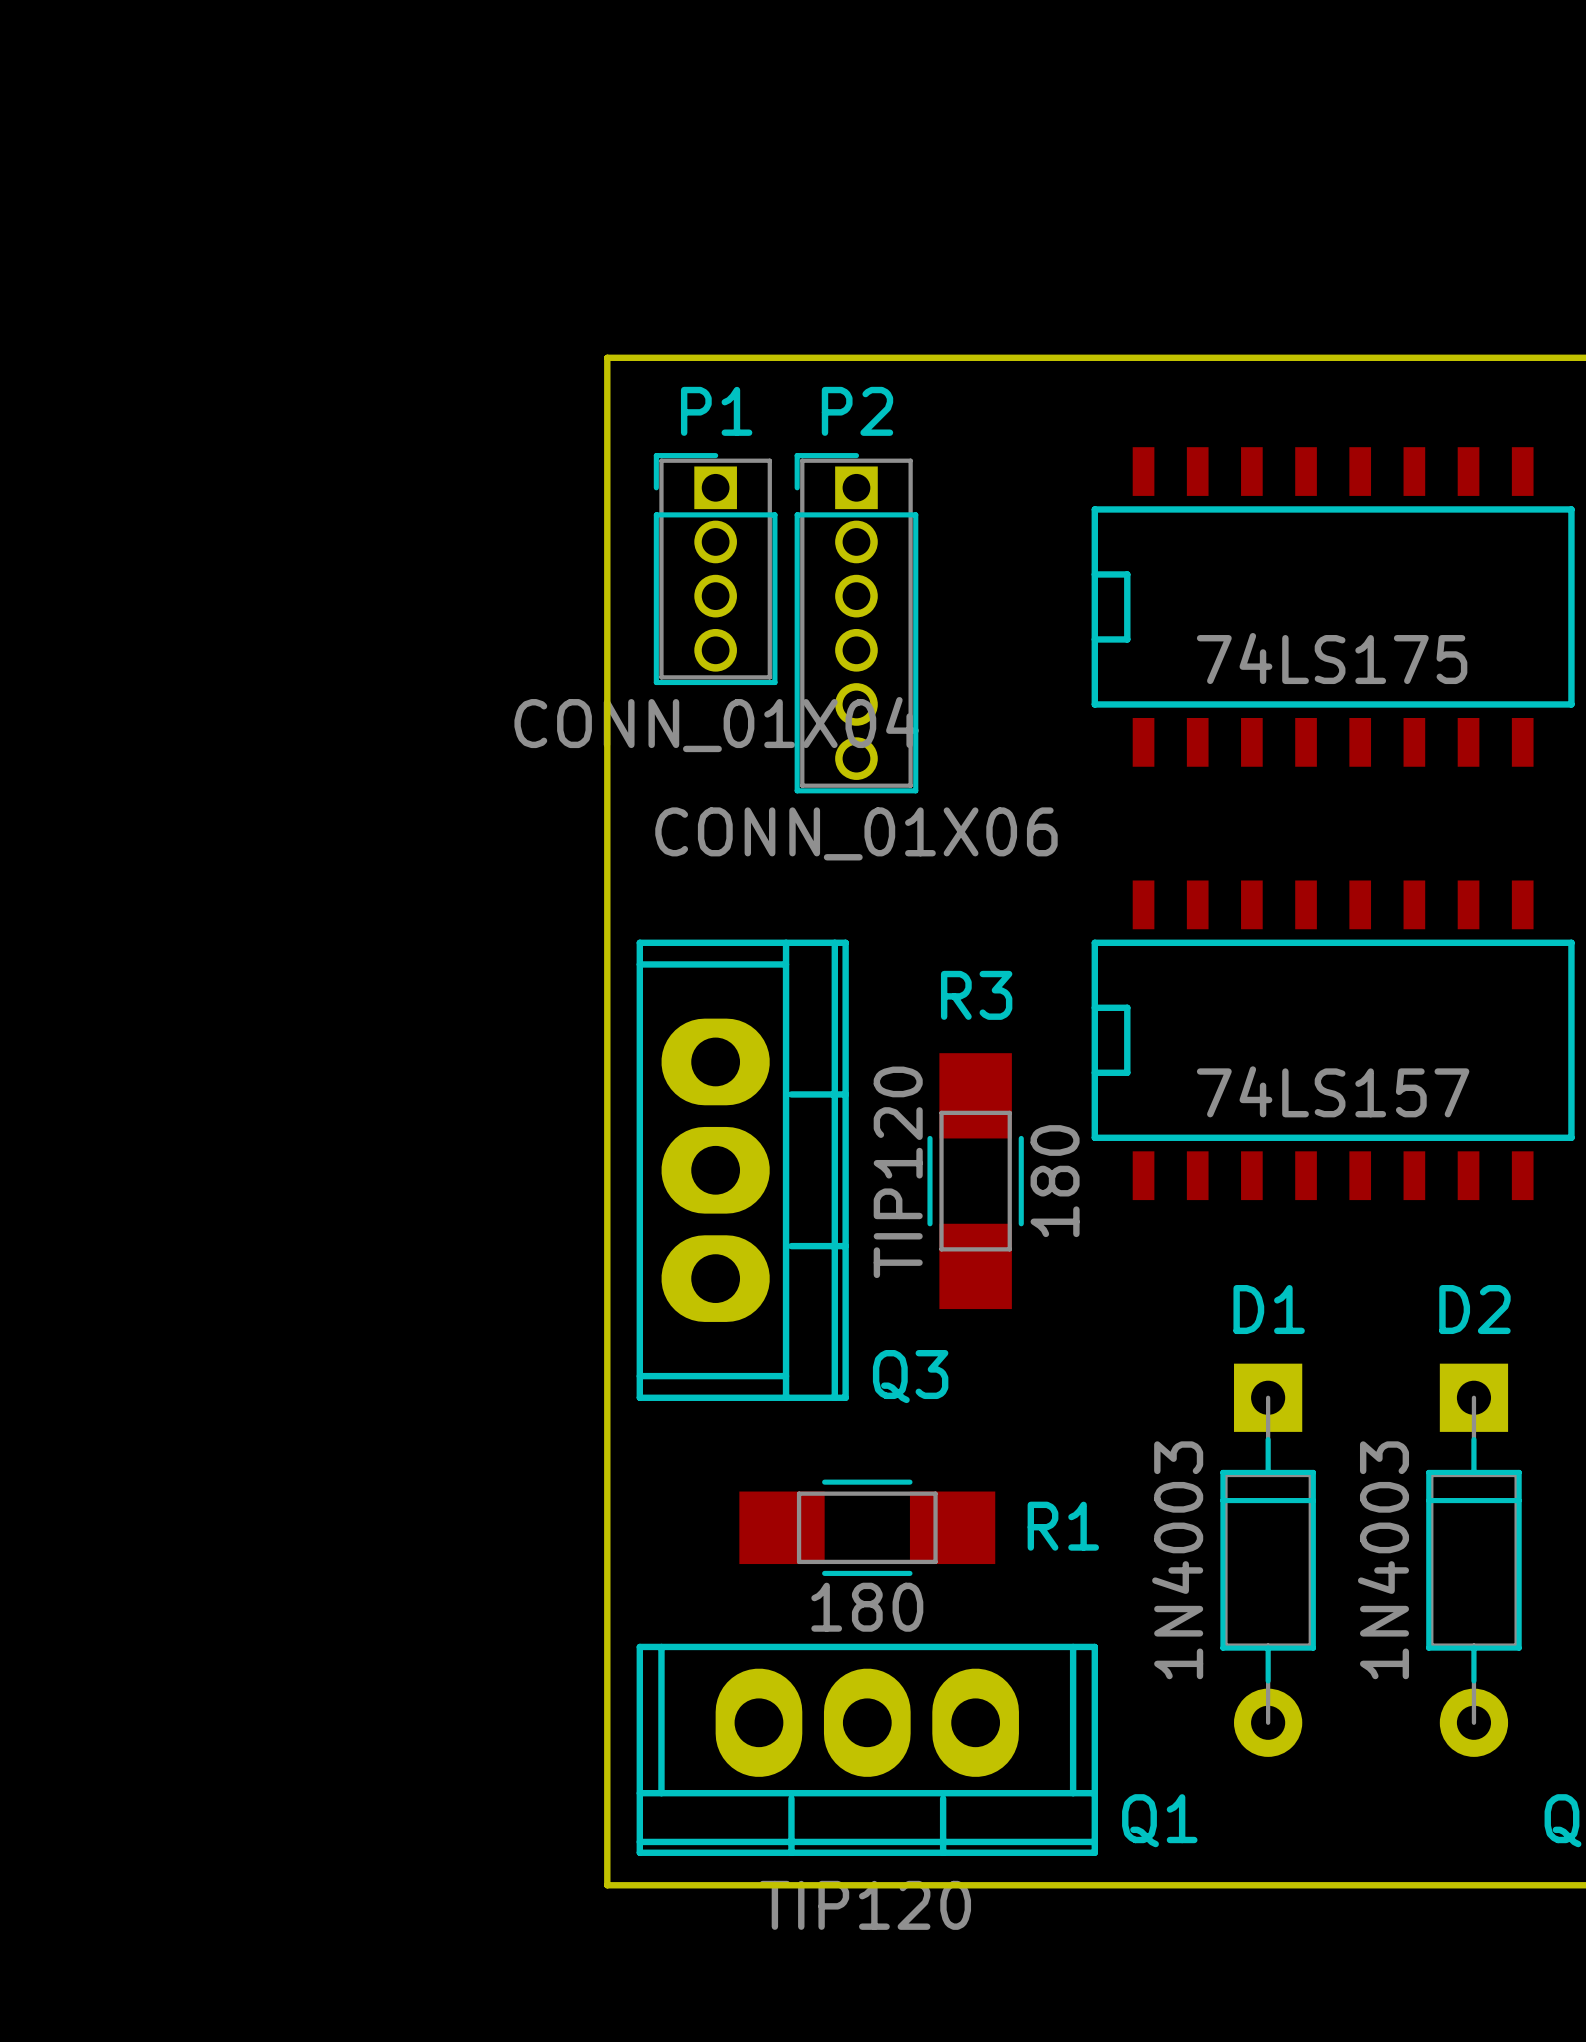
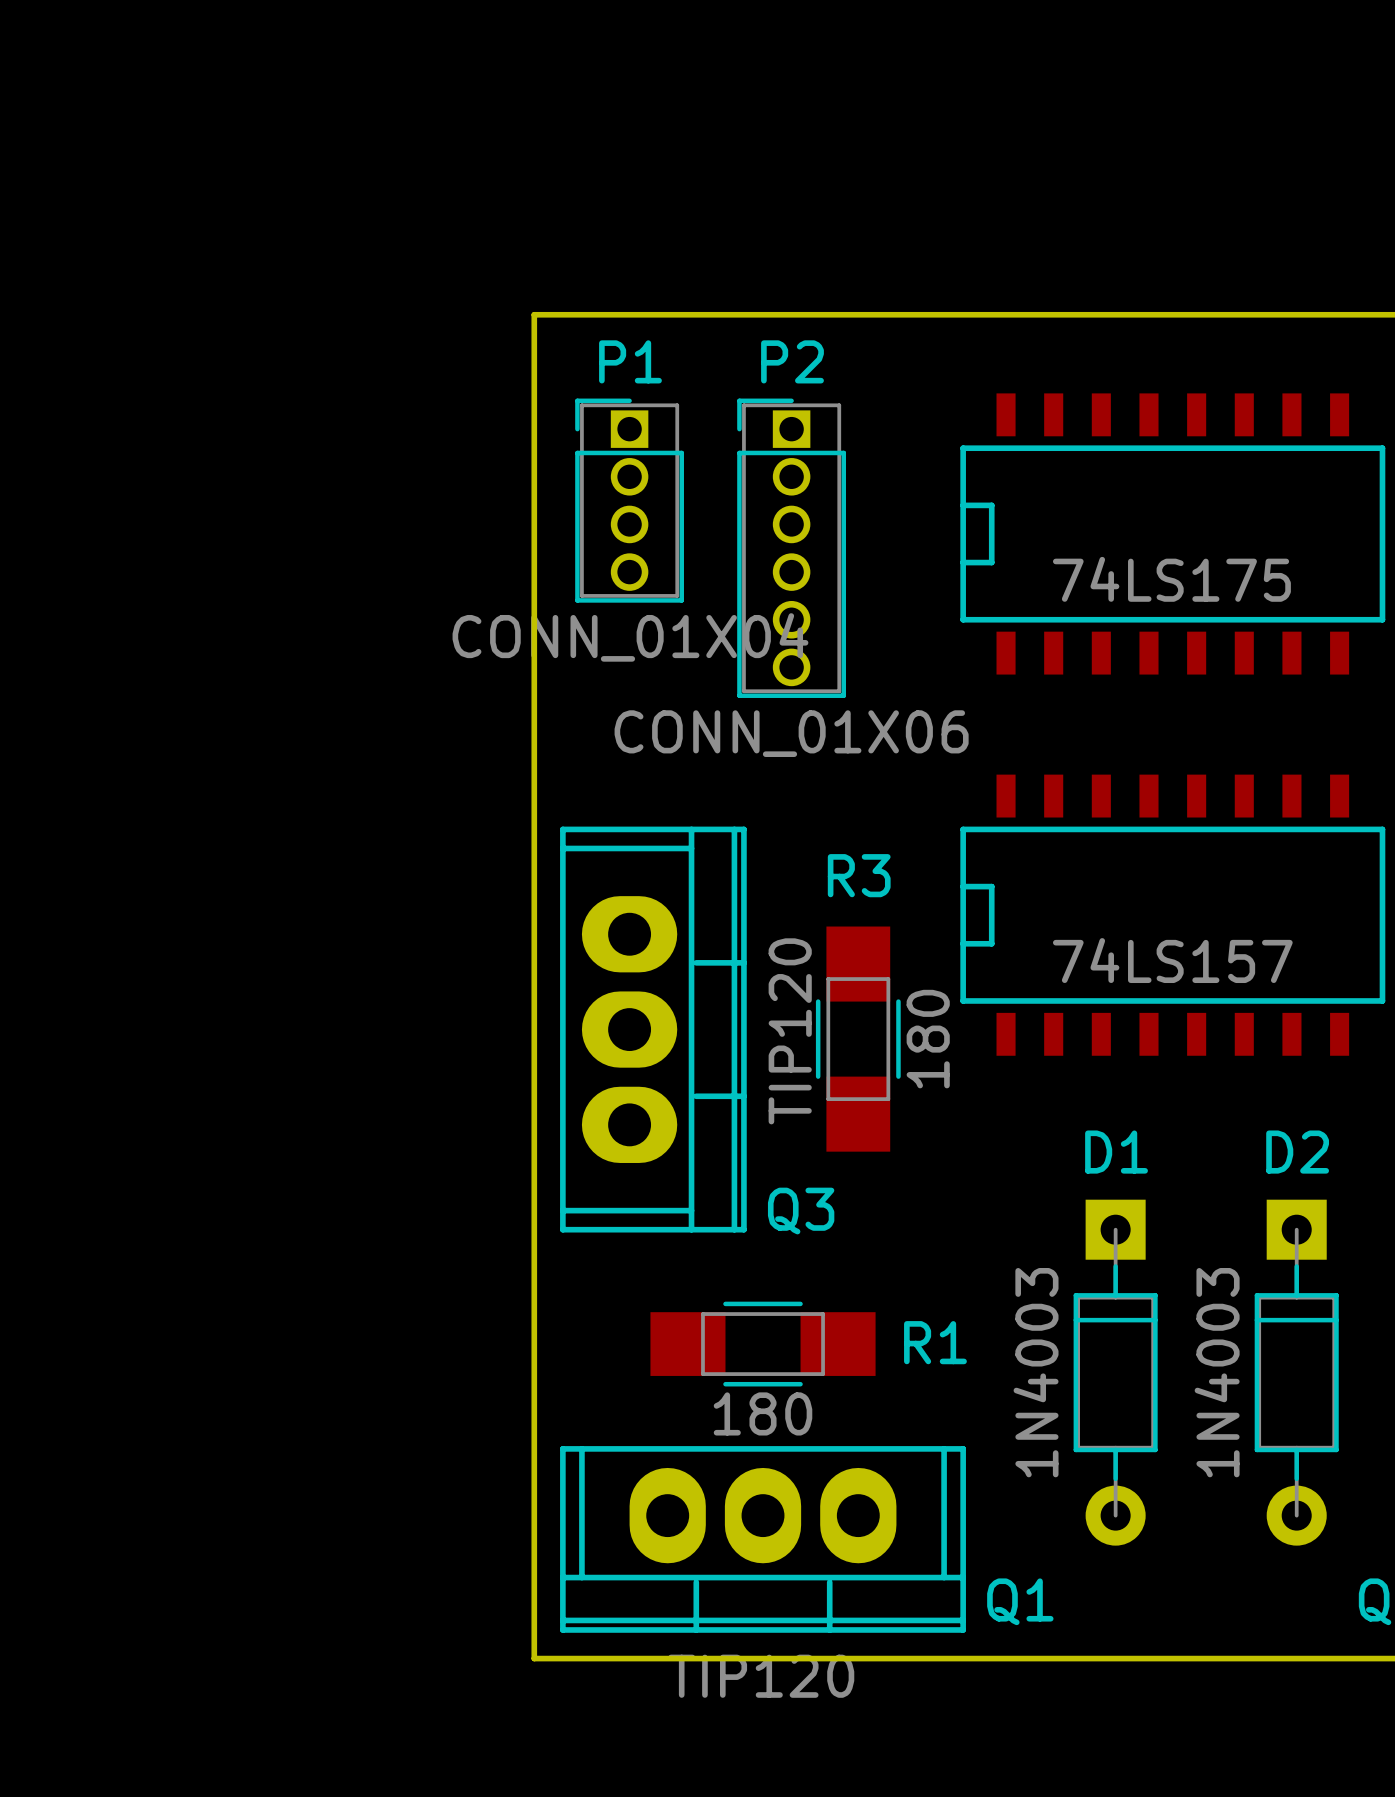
P2 position: (856, 623) -> (791, 548)

